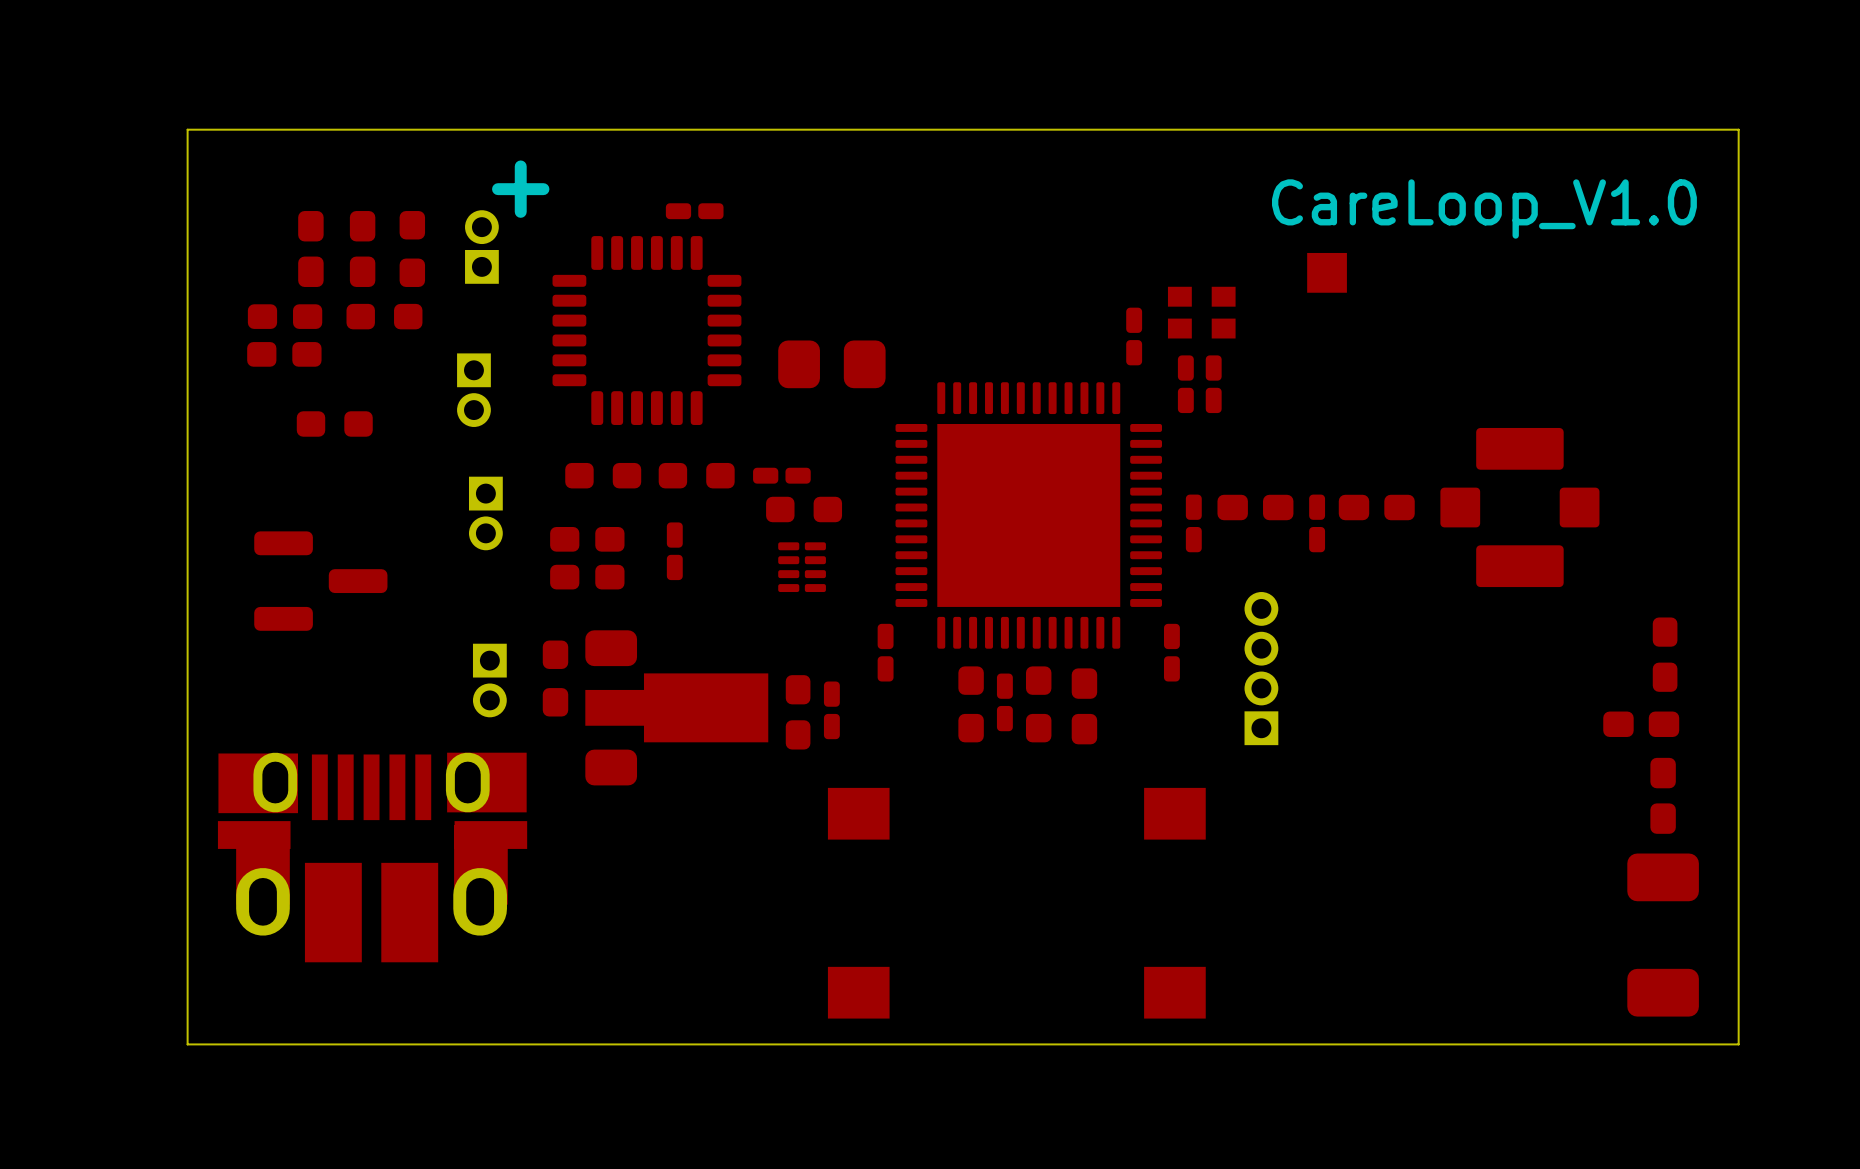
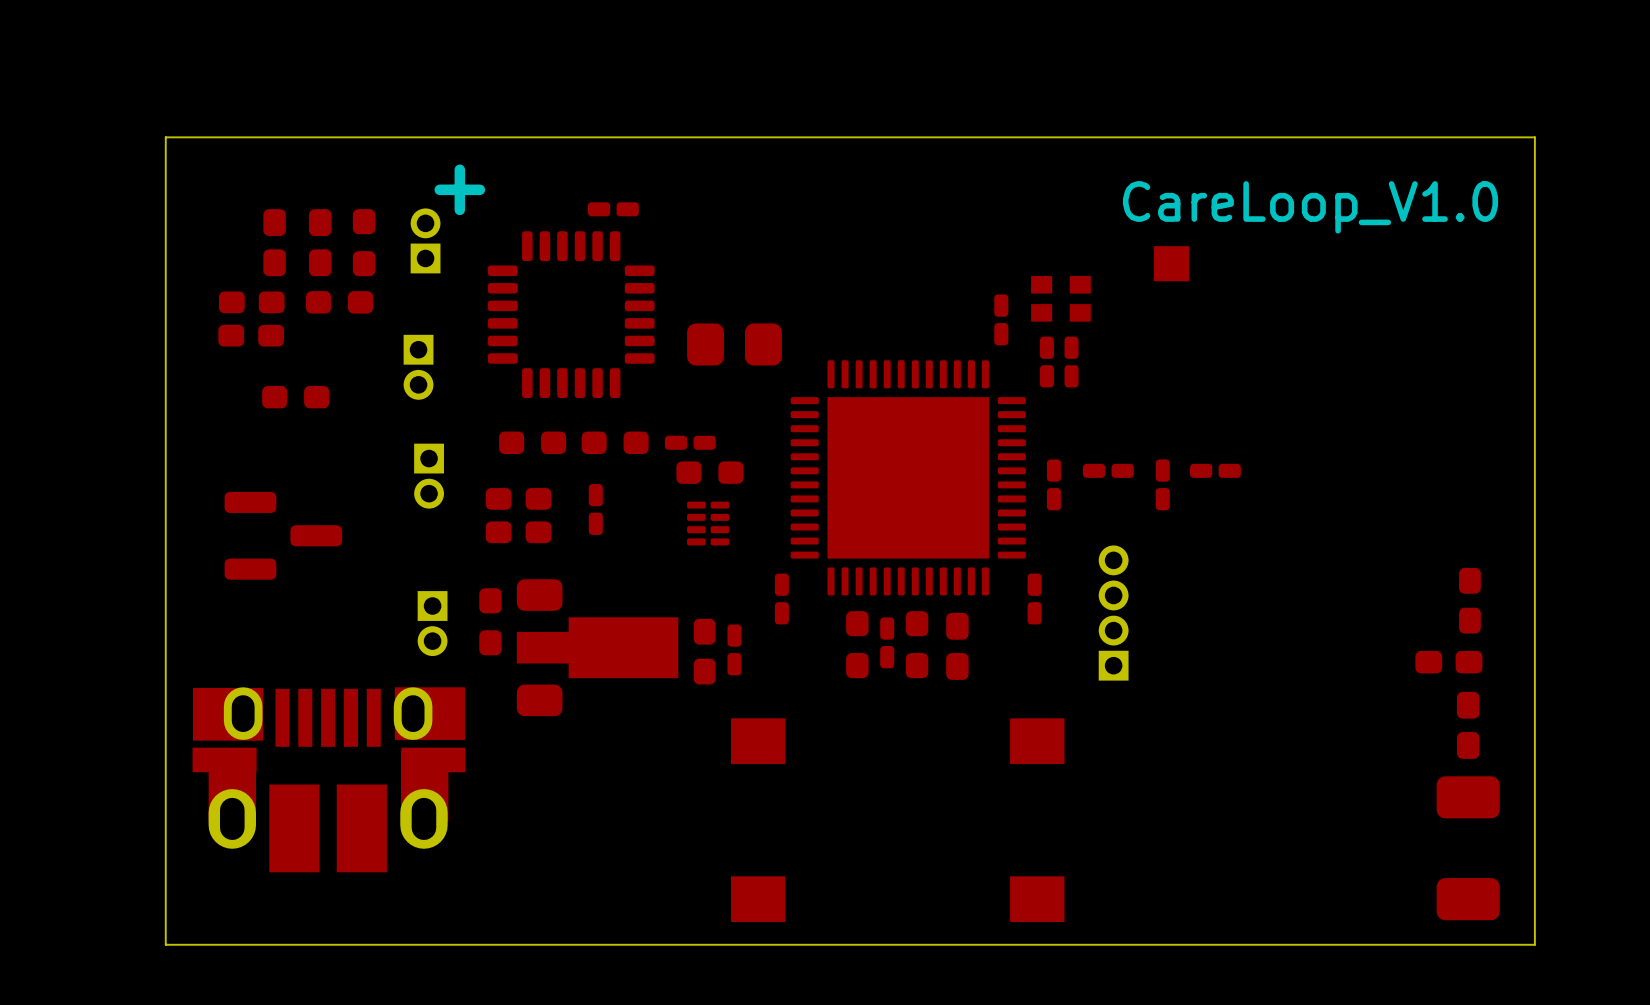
part footprint: [1217, 494, 1294, 521] -> [1082, 463, 1134, 478]
part footprint: [1338, 494, 1415, 521] -> [1189, 463, 1241, 478]
part: (1519, 507) -> none

